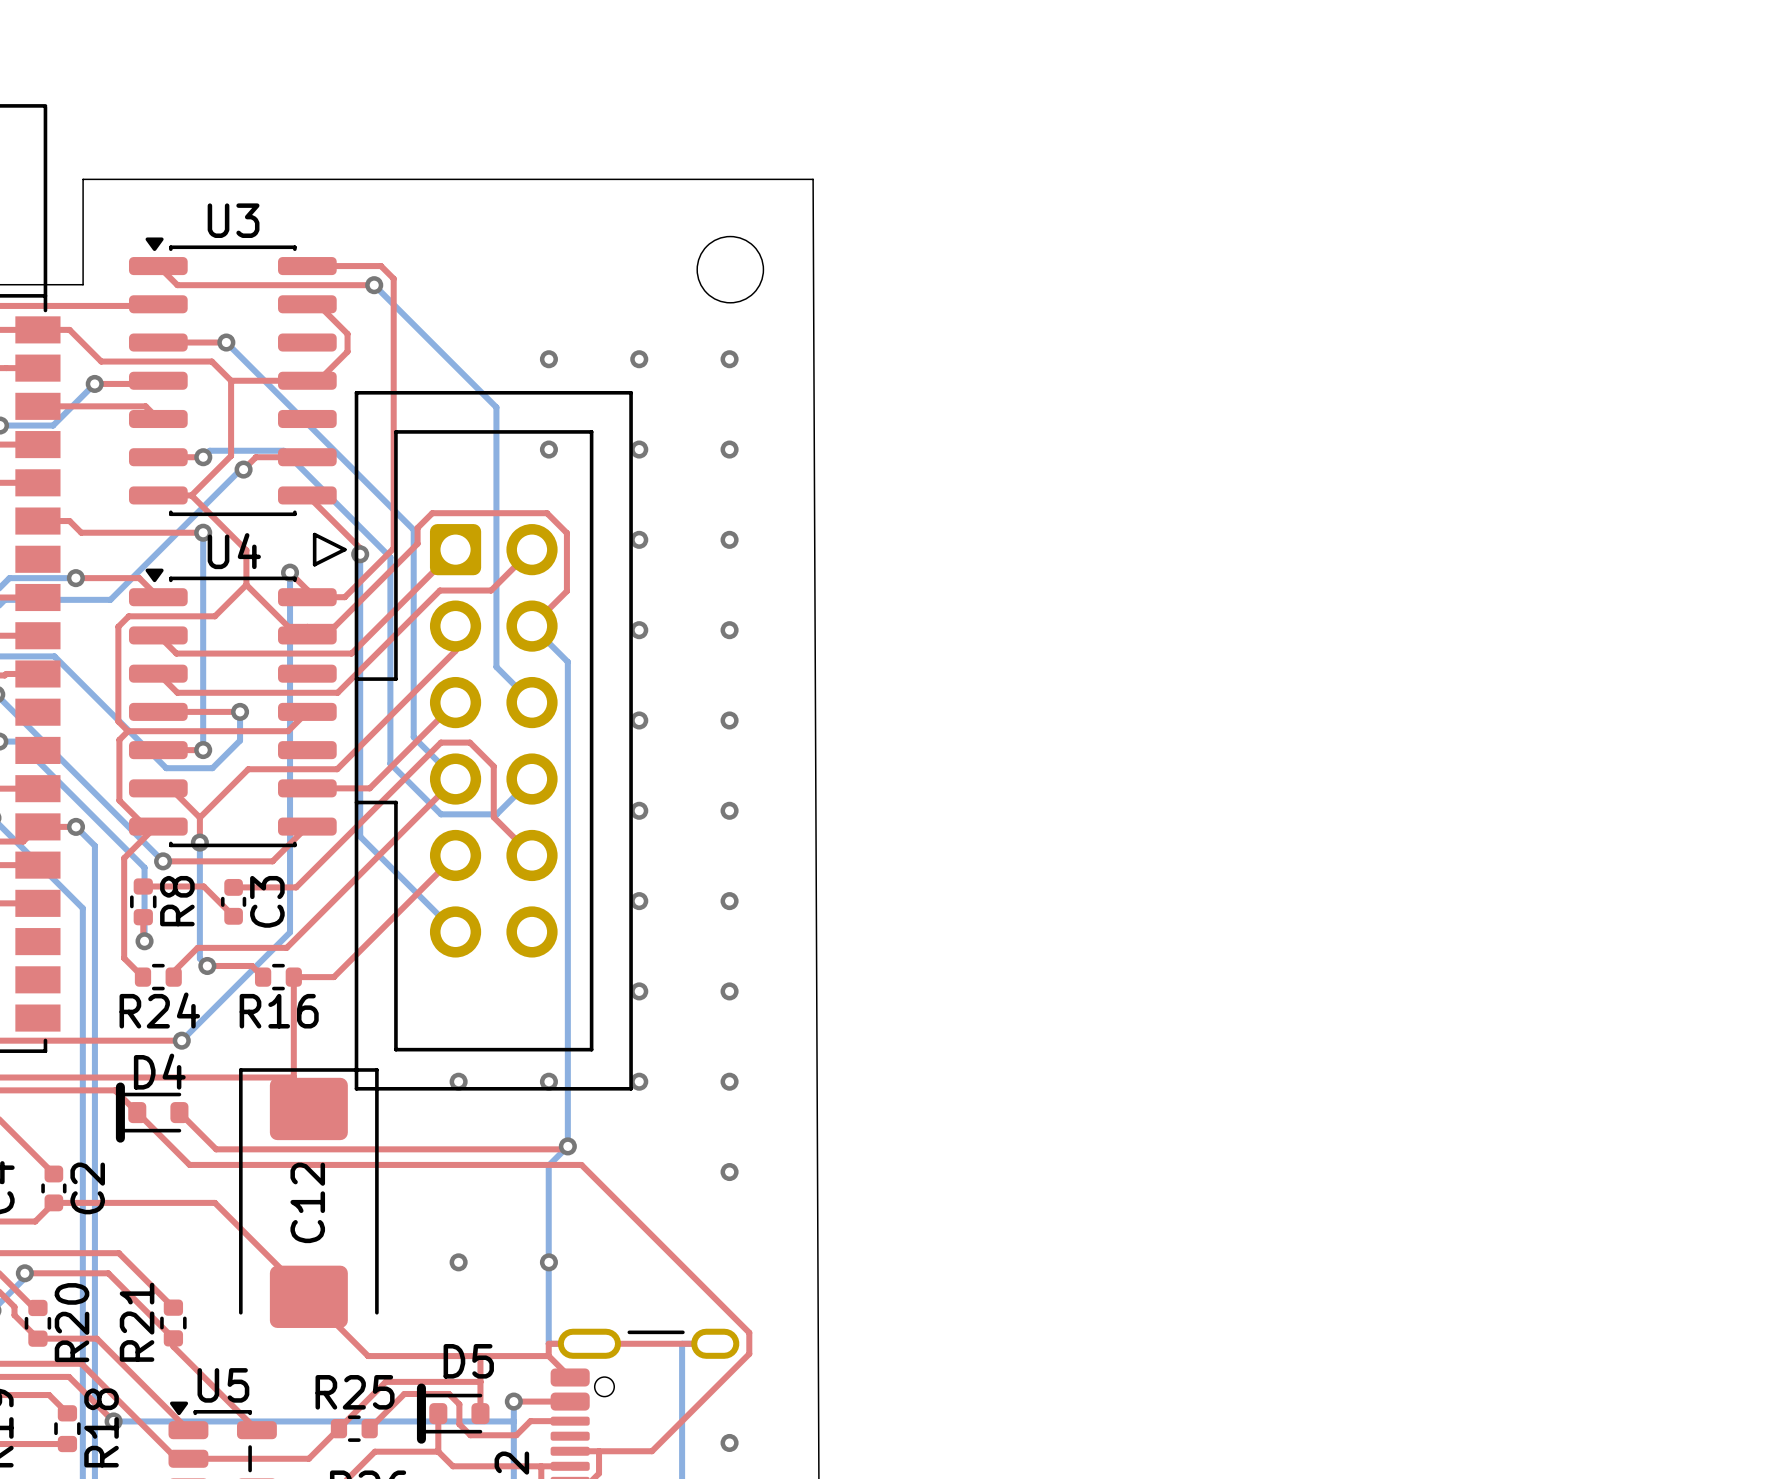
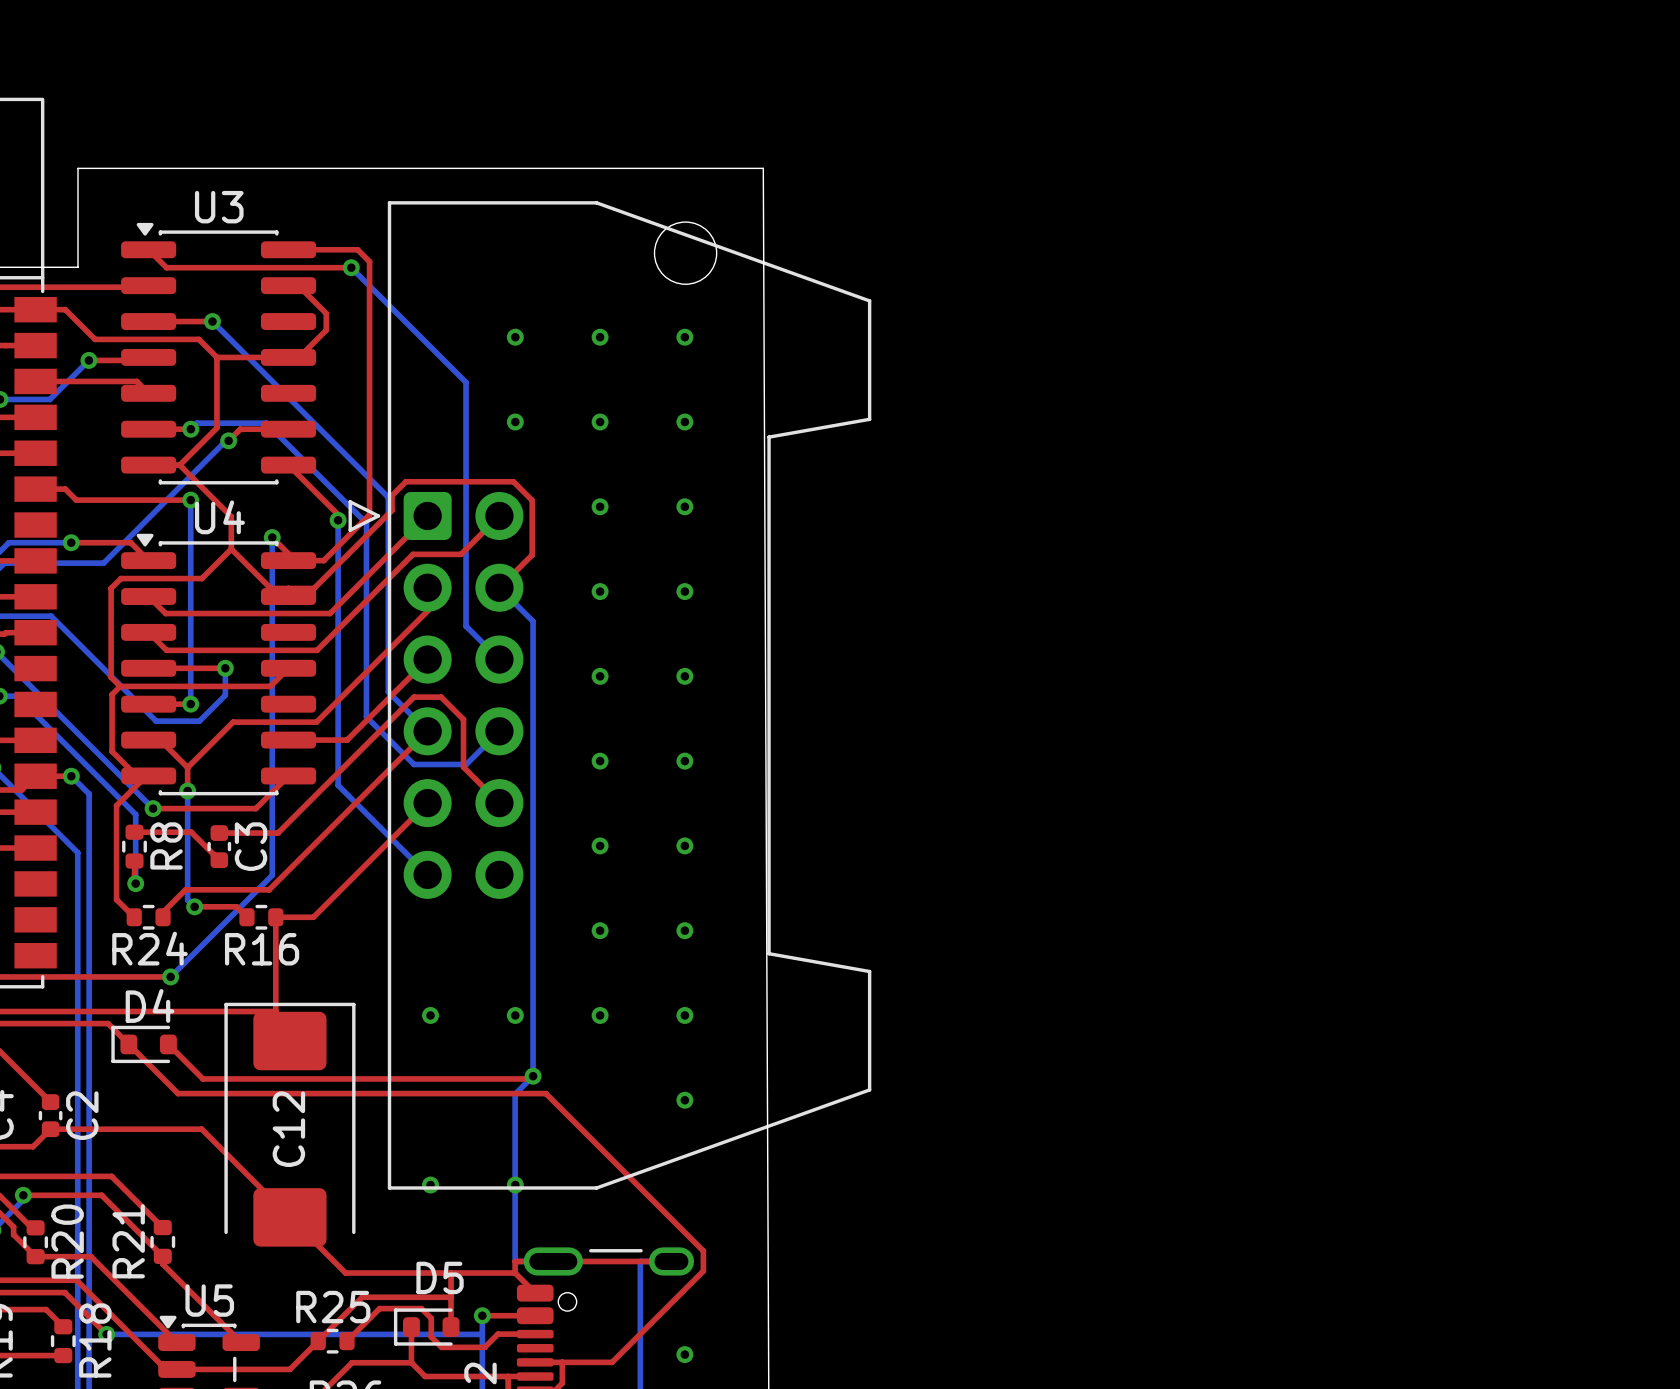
part: (472, 740) -> none
part: none -> (609, 695)
D4 footprint: [115, 1082, 189, 1143] -> [111, 1025, 177, 1064]
D5 footprint: [416, 1383, 490, 1444] -> [393, 1308, 460, 1346]

